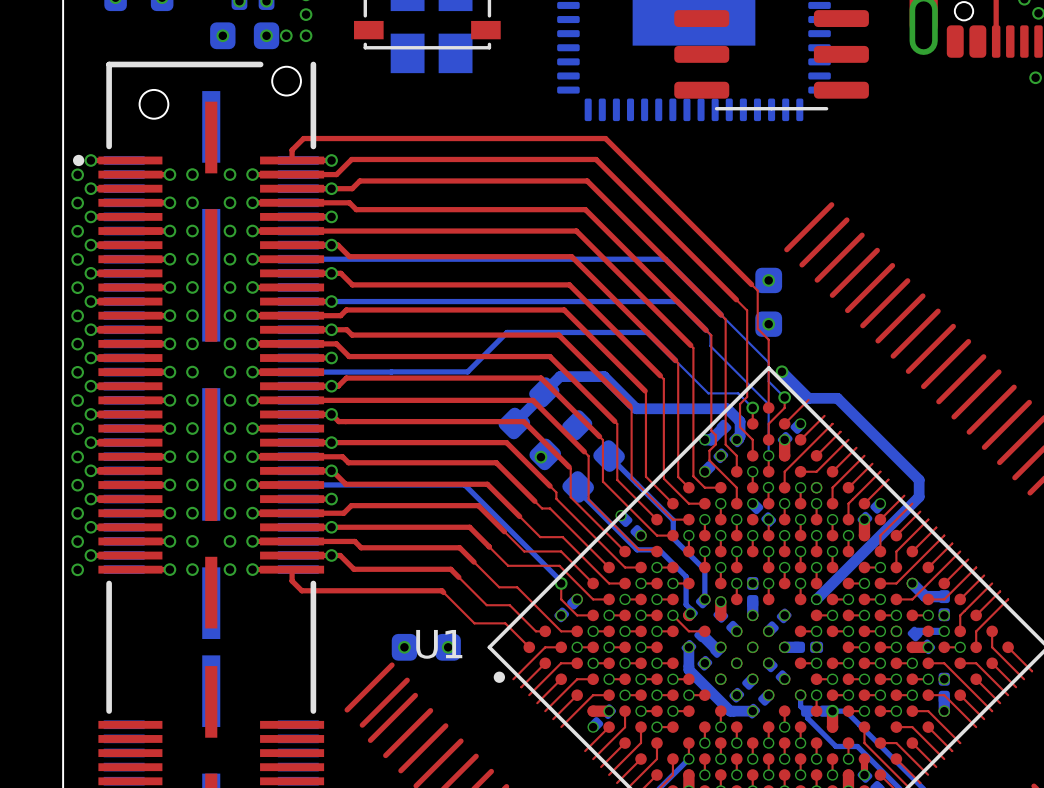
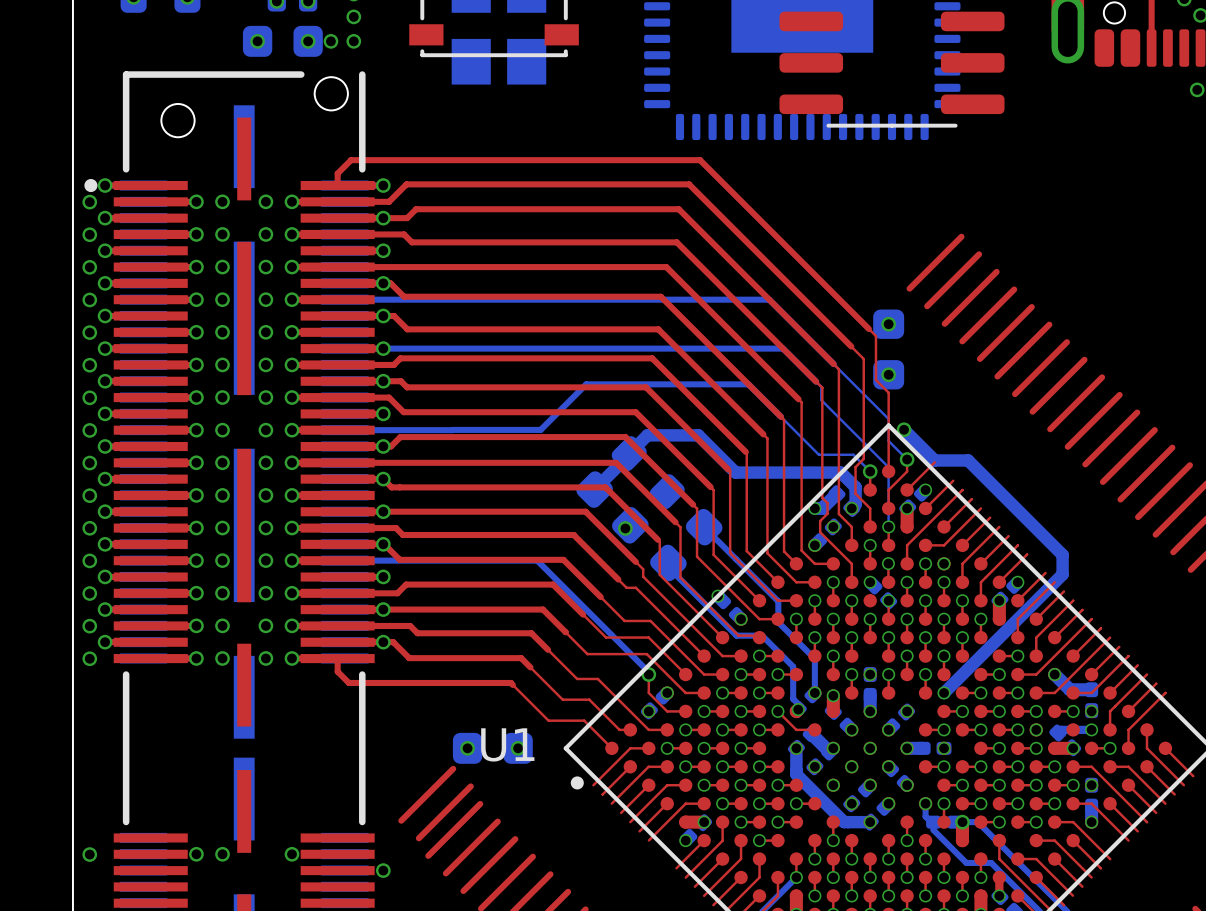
via: none -> (196, 854)
via: none -> (222, 854)
via: none -> (291, 854)
via: none -> (89, 854)
via: none -> (383, 870)

